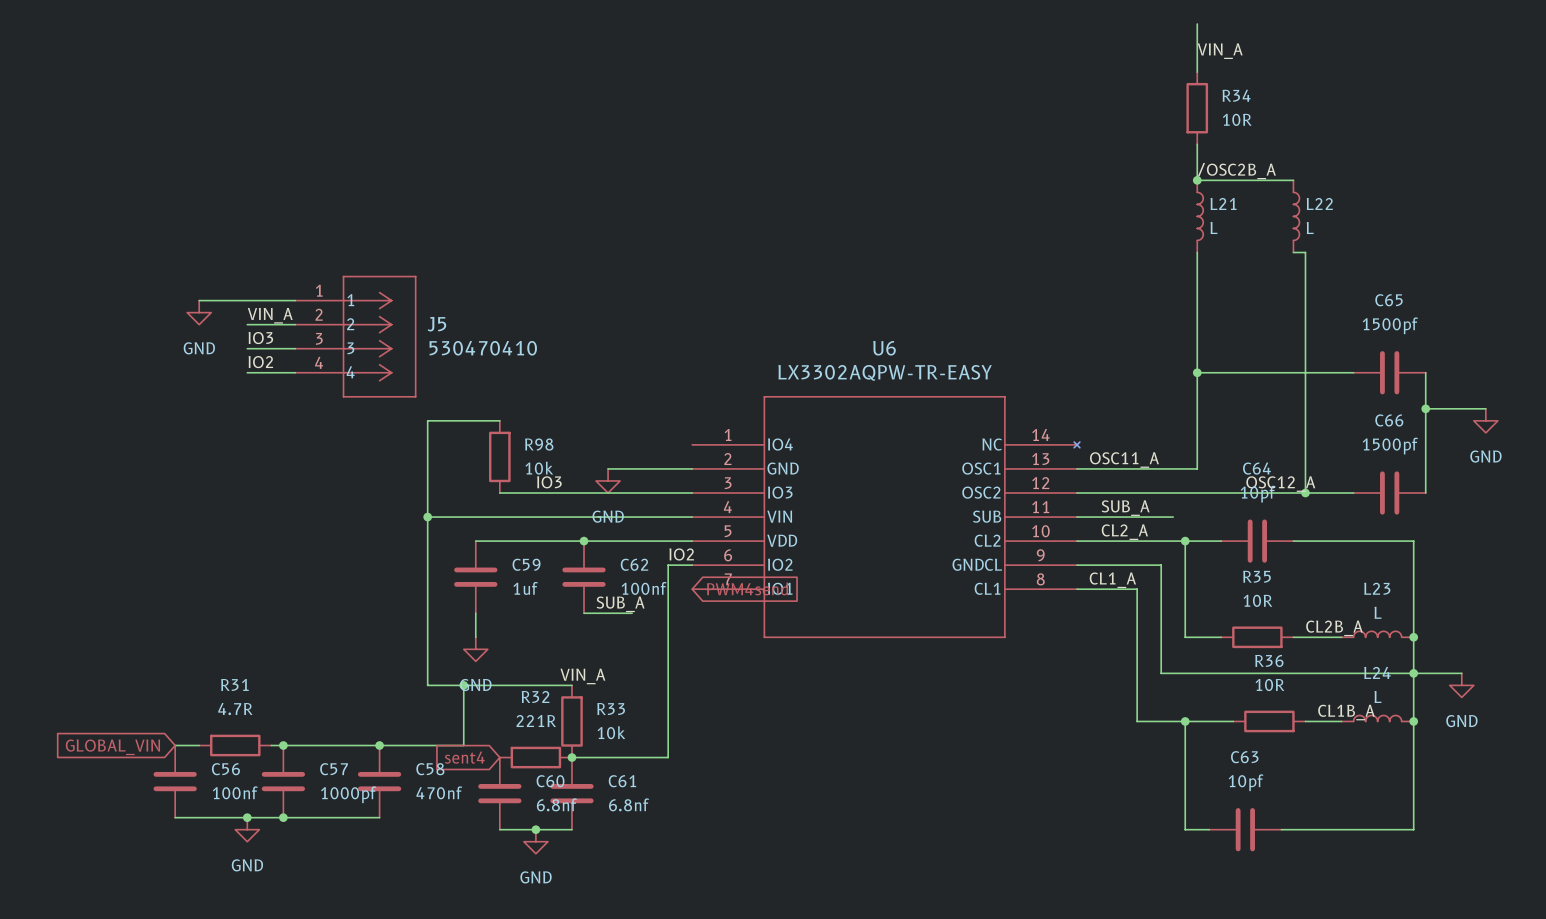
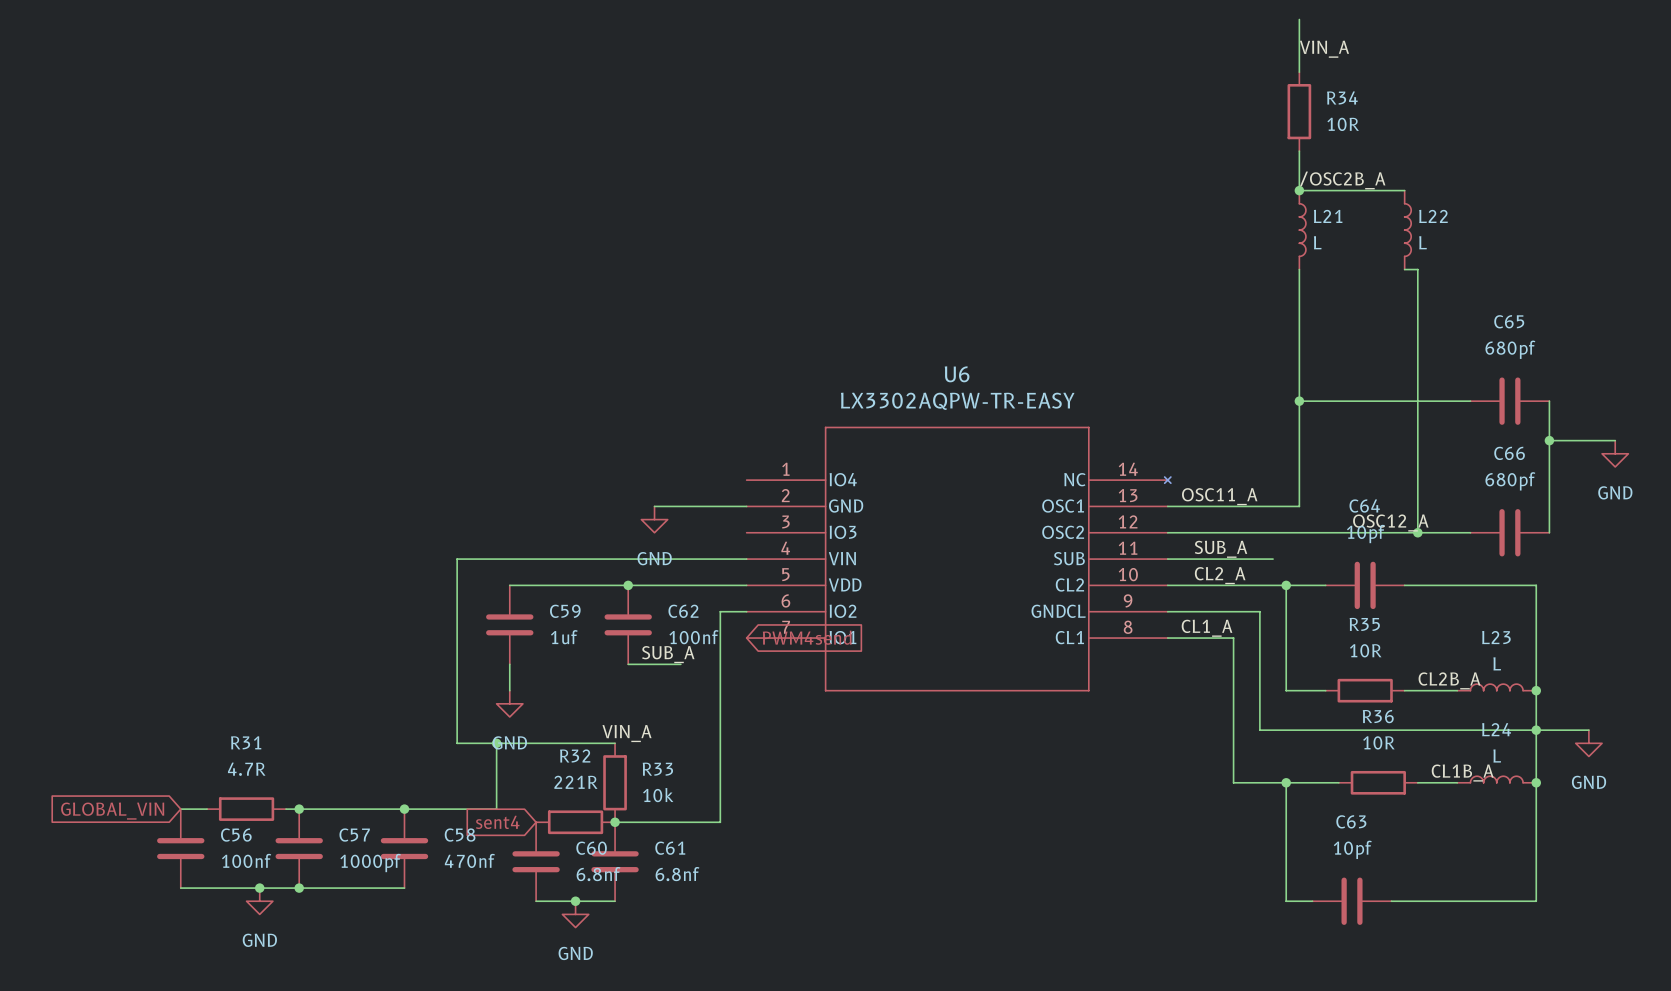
wire: (199, 300) (295, 300) -> none
power symbol: GND (199, 312) -> none
label: VIN_A (270, 315) -> none
wire: (247, 324) (295, 324) -> none
C65 value: 1500pf (1390, 325) -> 680pf (1510, 349)
J5: 530470410 (355, 336) -> none
label: IO3 (260, 338) -> none
wire: (247, 348) (295, 348) -> none
label: IO2 (260, 362) -> none
wire: (247, 372) (295, 372) -> none
wire: (499, 420) (427, 420) (427, 517) -> none
C66 value: 1500pf (1390, 446) -> 680pf (1510, 481)
R98: 10k (499, 456) -> none
label: IO3 (549, 482) -> none
wire: (499, 493) (692, 493) -> none
junction: (427, 517) -> none
label: IO2 (681, 554) -> none

